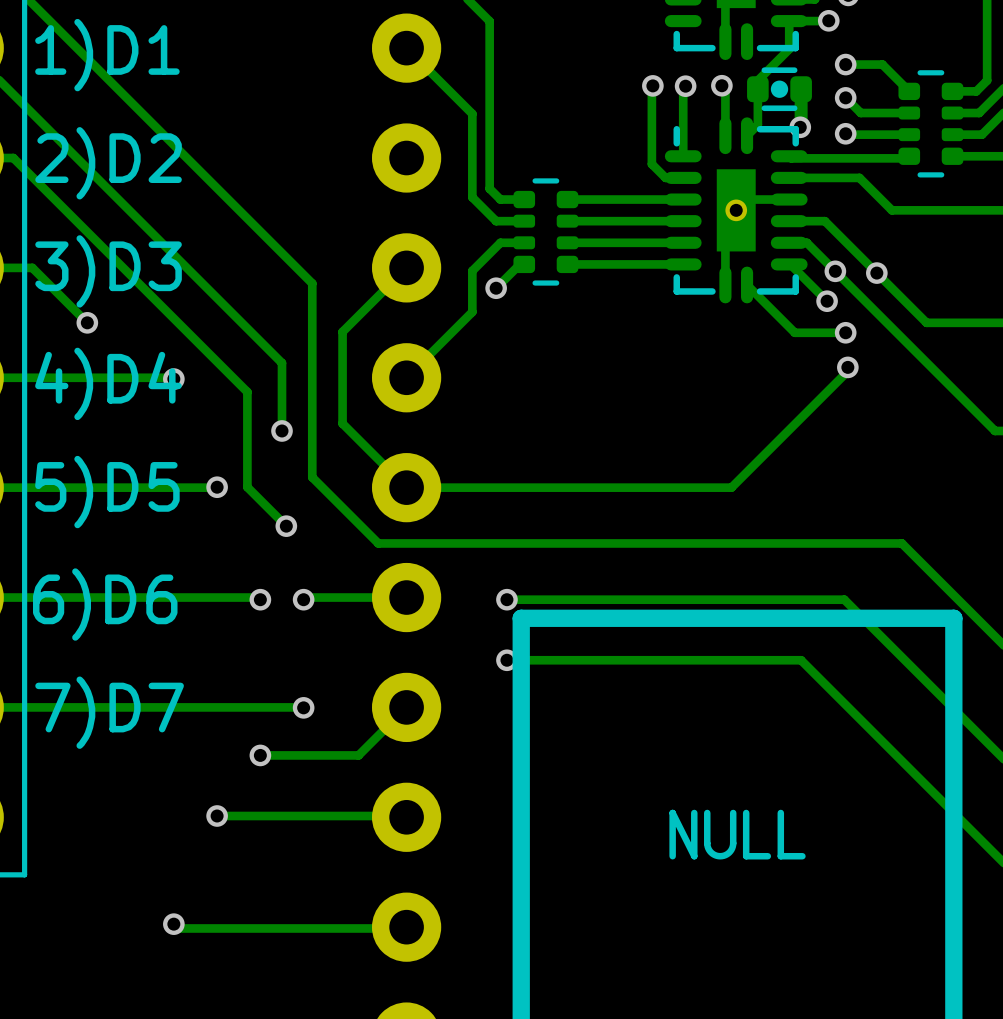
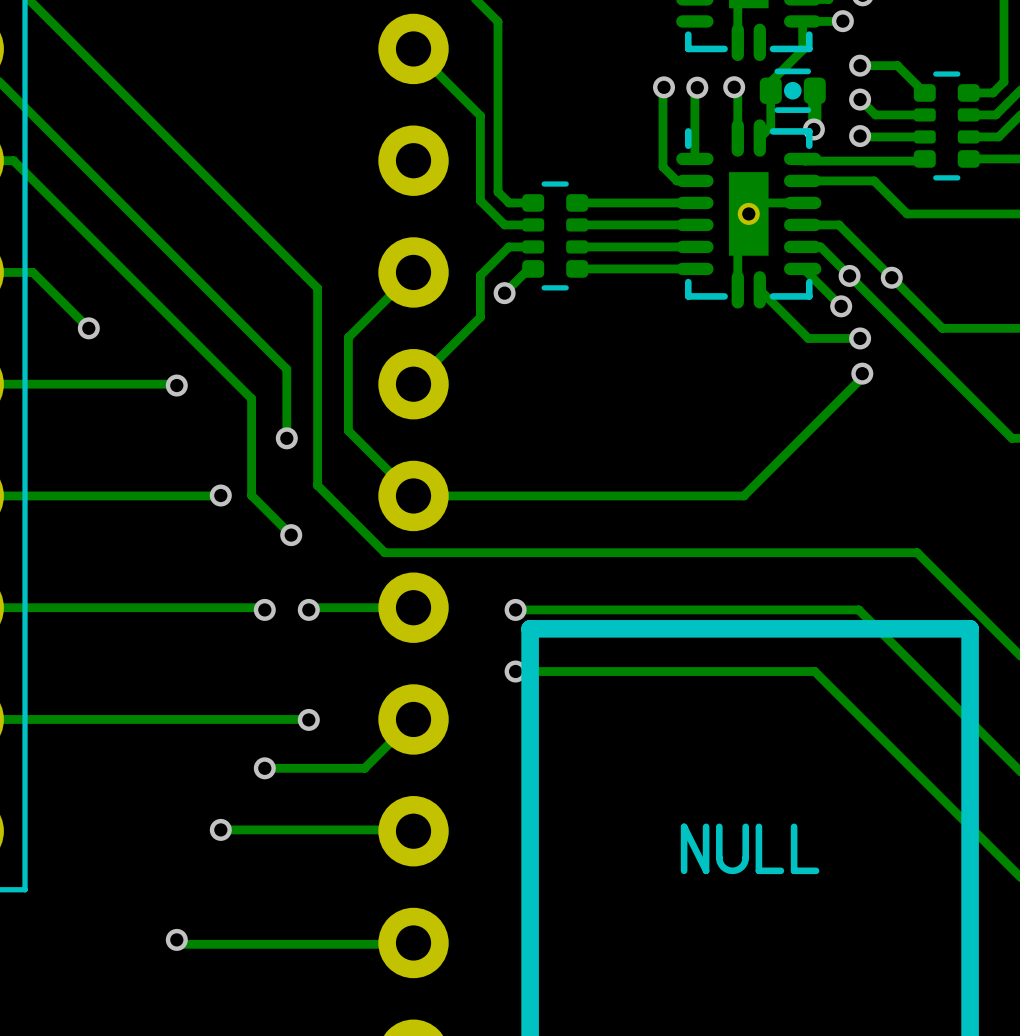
text: 1)D1 (107, 55) -> none
text: 2)D2 (108, 163) -> none
text: 3)D3 (108, 271) -> none
text: 4)D4 (108, 383) -> none
text: 5)D5 (107, 492) -> none
text: 6)D6 (105, 604) -> none
text: 7)D7 (109, 712) -> none

